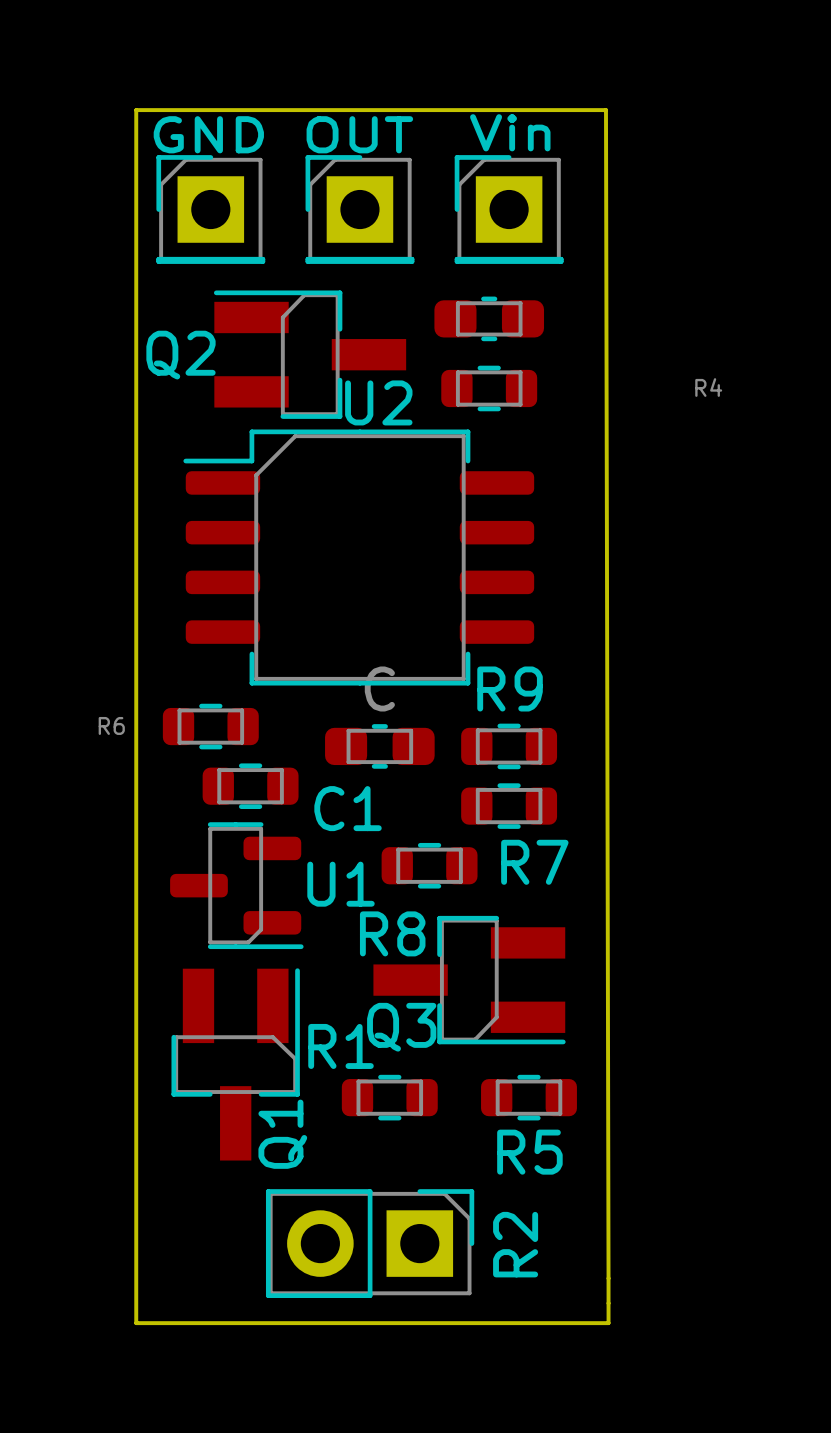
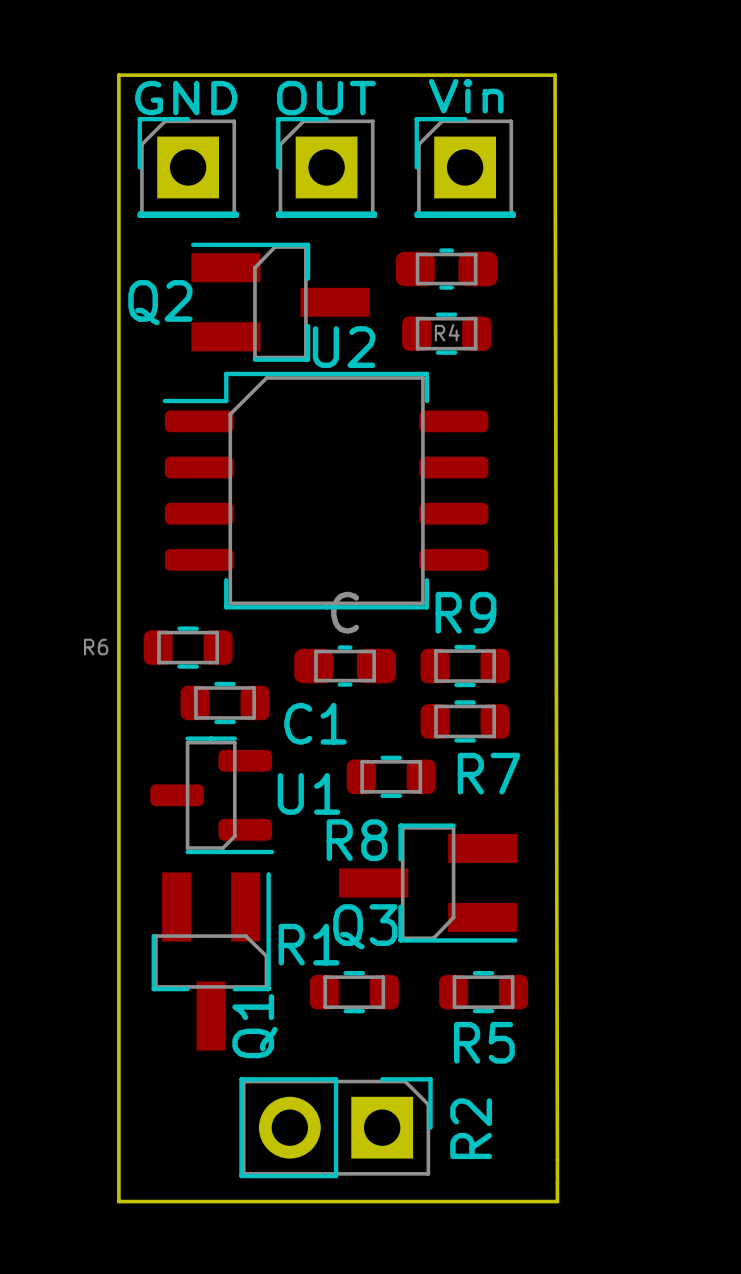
R4 name position: R4 (708, 387) -> R4 (447, 332)

